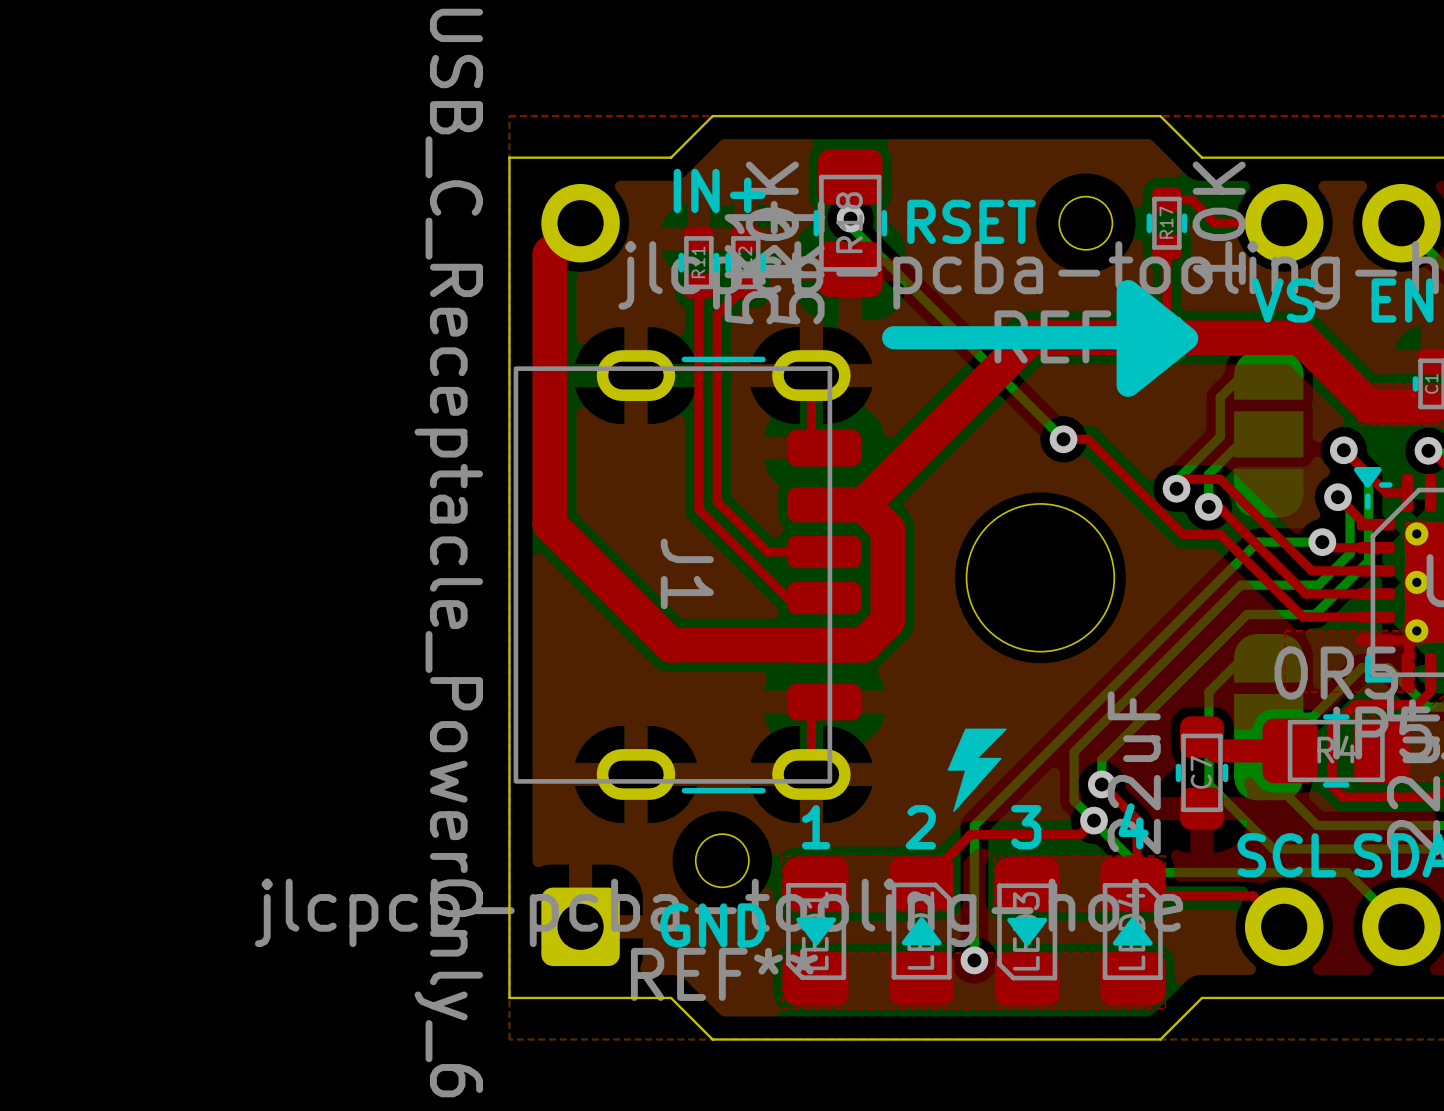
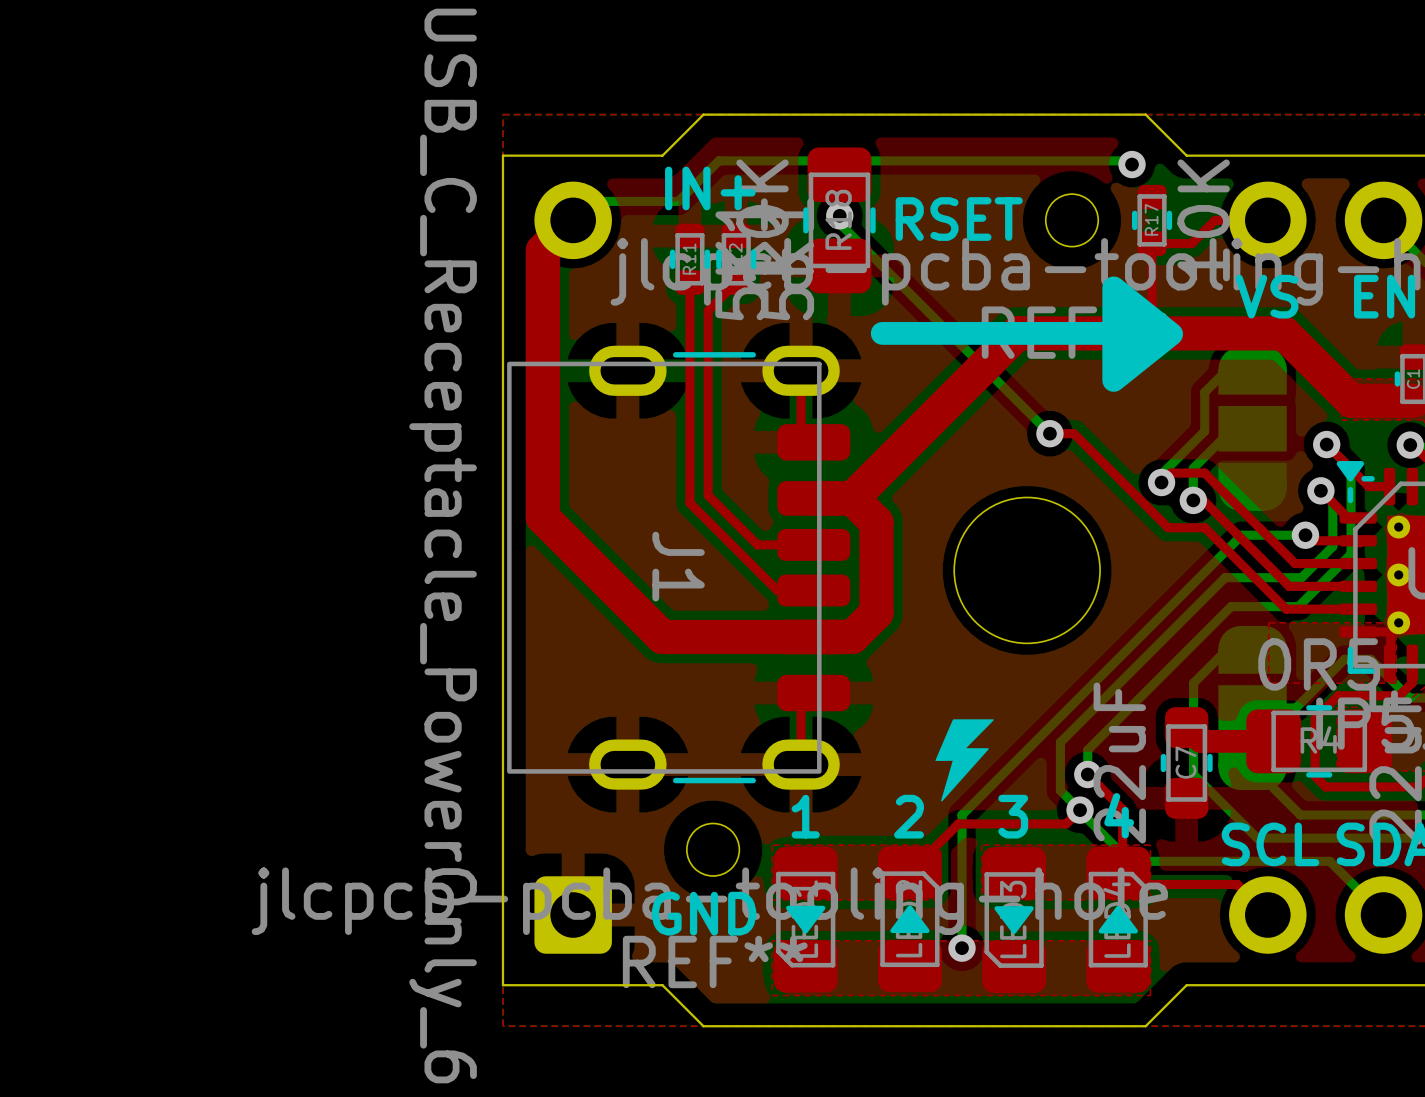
bottom track: none -> (1132, 164) (1128, 160) (718, 160) (678, 201) (592, 201) (573, 220)
via: none -> (1132, 164)
top track: (1166, 199) (1191, 199) (1215, 223) (1230, 223) -> (1164, 243) (1191, 243) (1215, 220)

